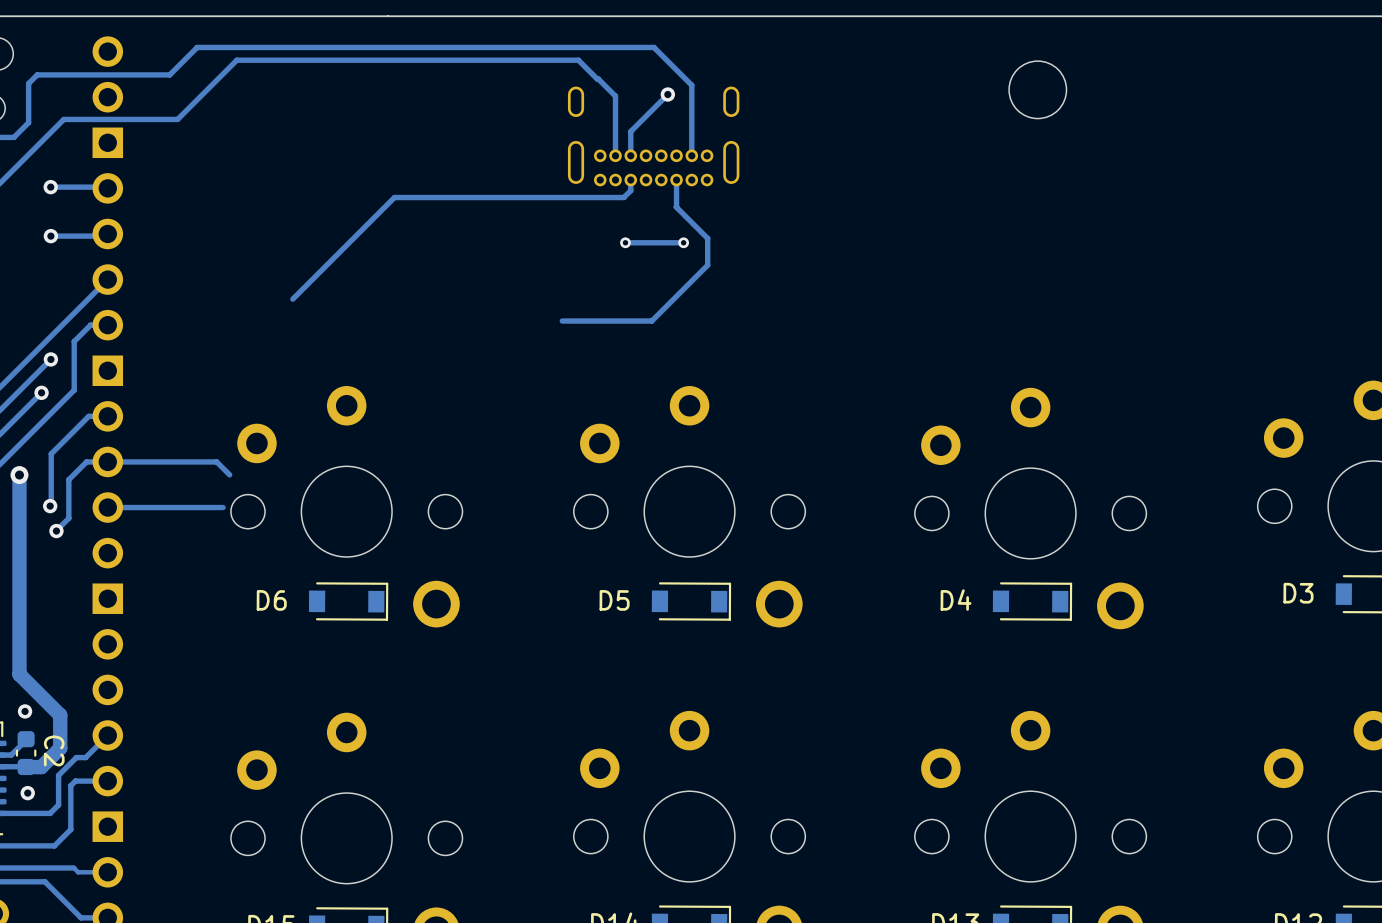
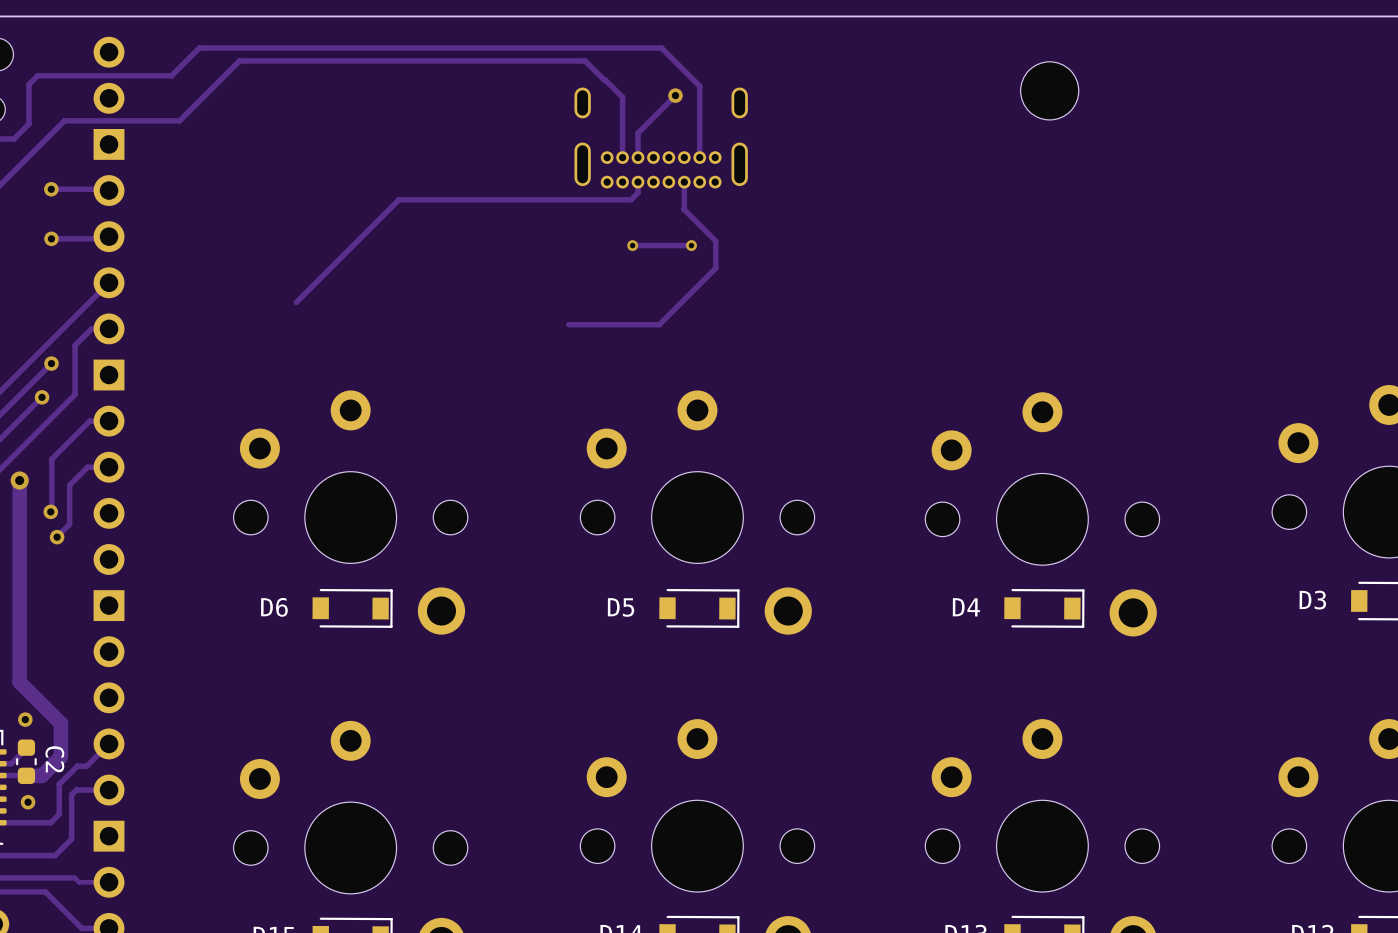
track: (107, 461) (216, 461) (229, 474) -> none
track: (223, 507) (107, 507) -> none

